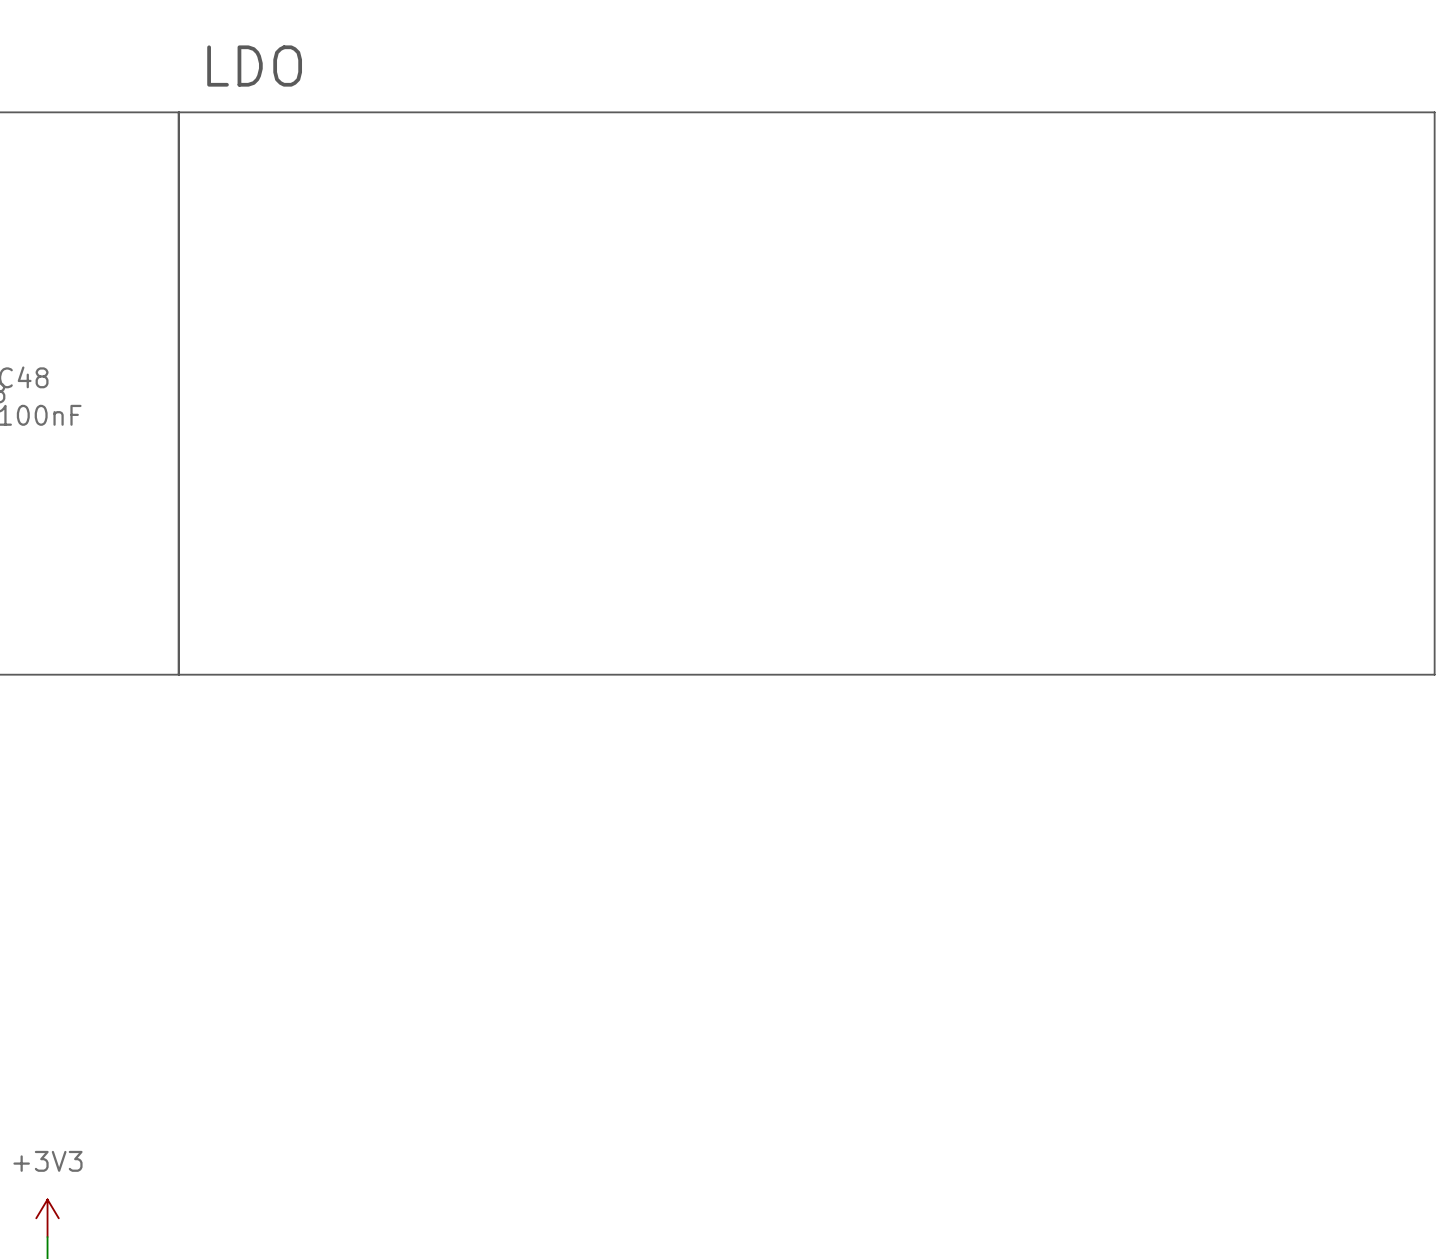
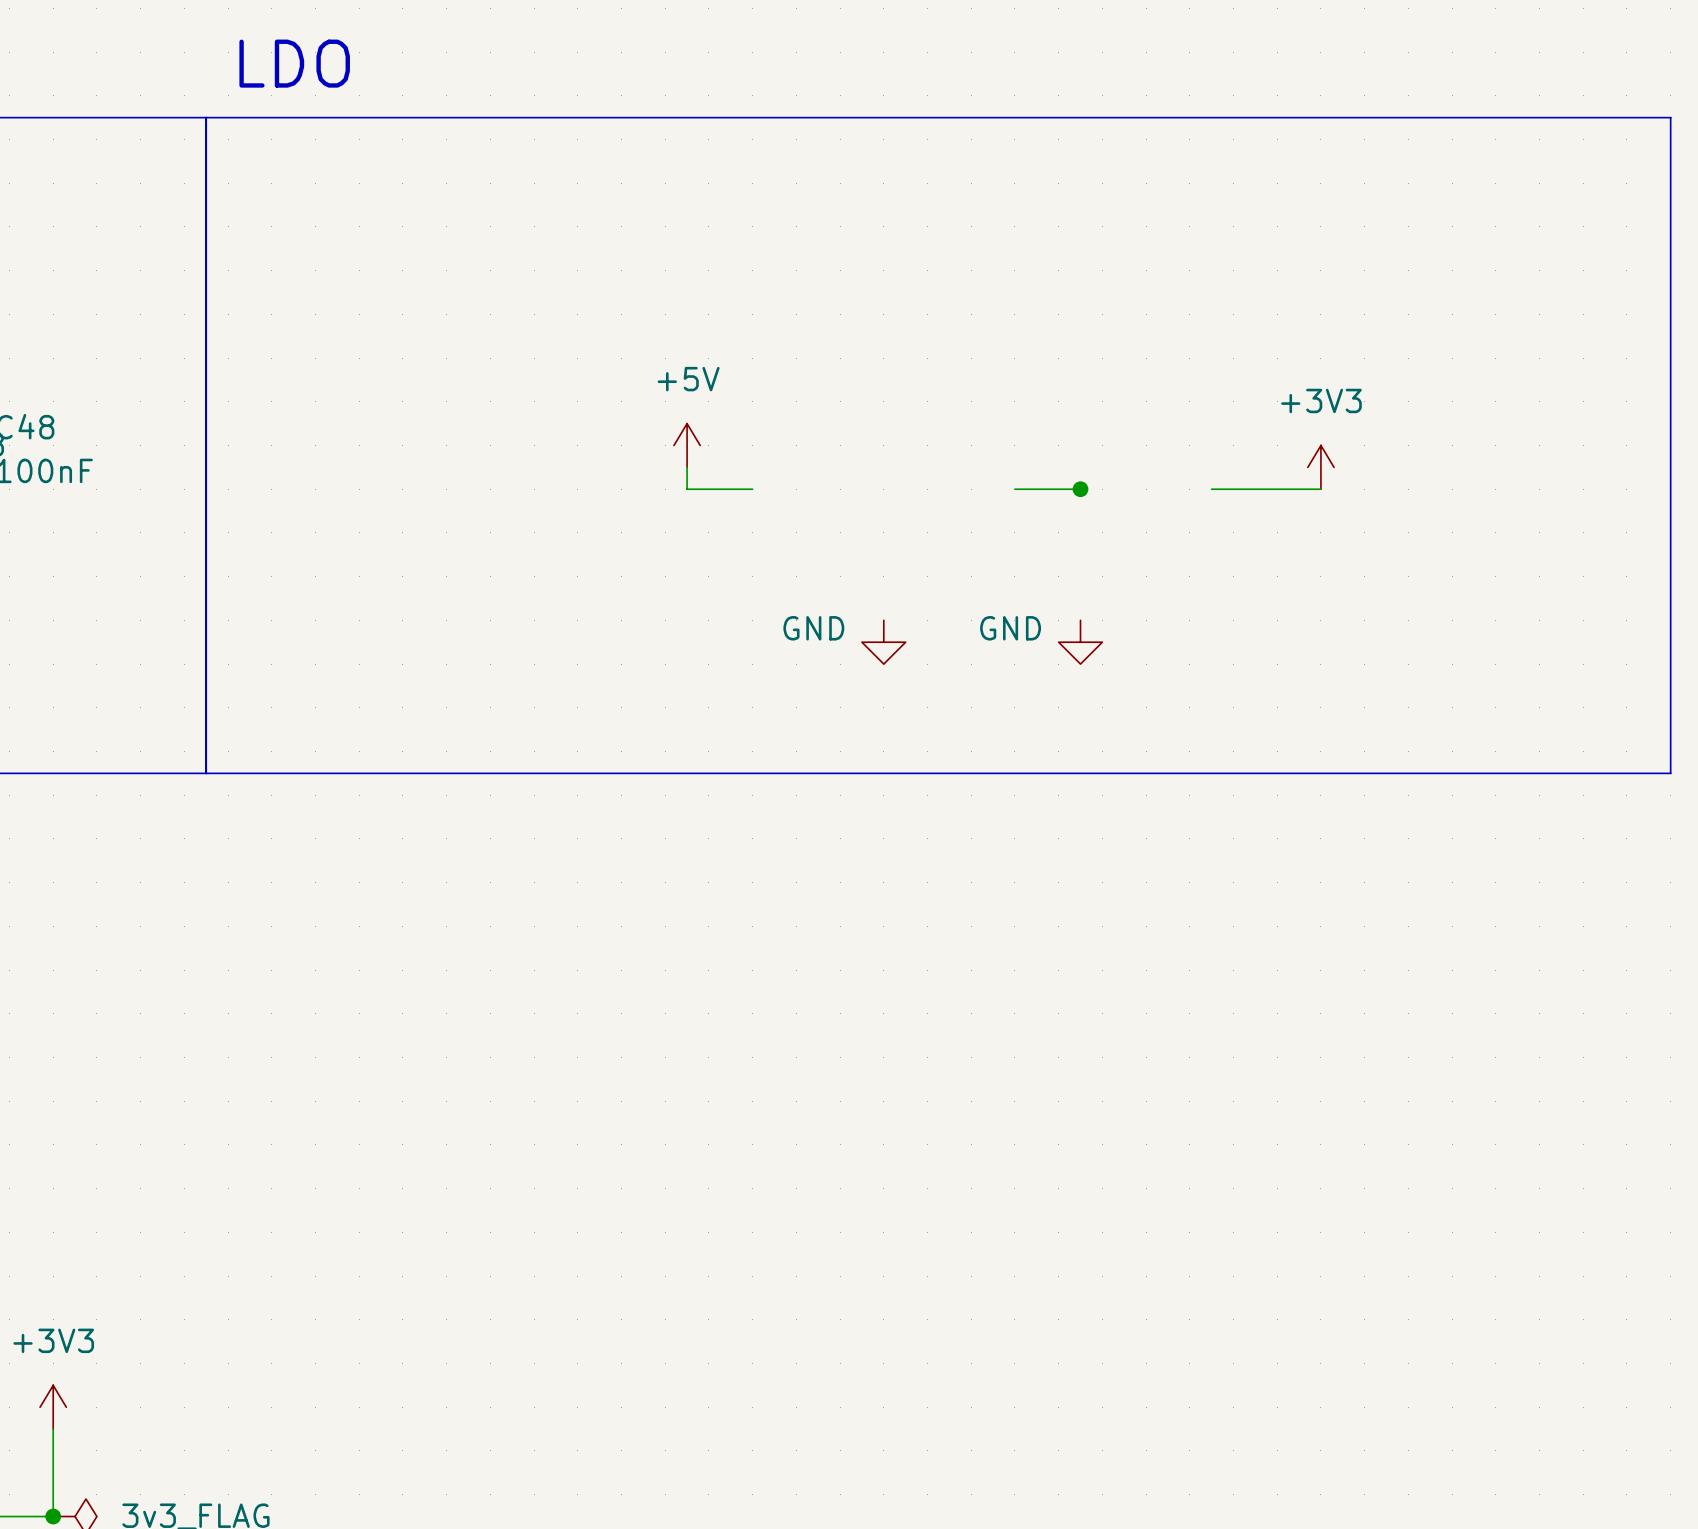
power symbol: none -> +5V (687, 445)
wire: none -> (687, 467) (687, 489) (752, 489)
power symbol: none -> +3V3 (1320, 467)
wire: none -> (1014, 489) (1080, 489)
junction: none -> (1080, 489)
wire: none -> (1211, 489) (1320, 489)
power symbol: none -> GND (883, 642)
power symbol: none -> GND (1080, 642)

